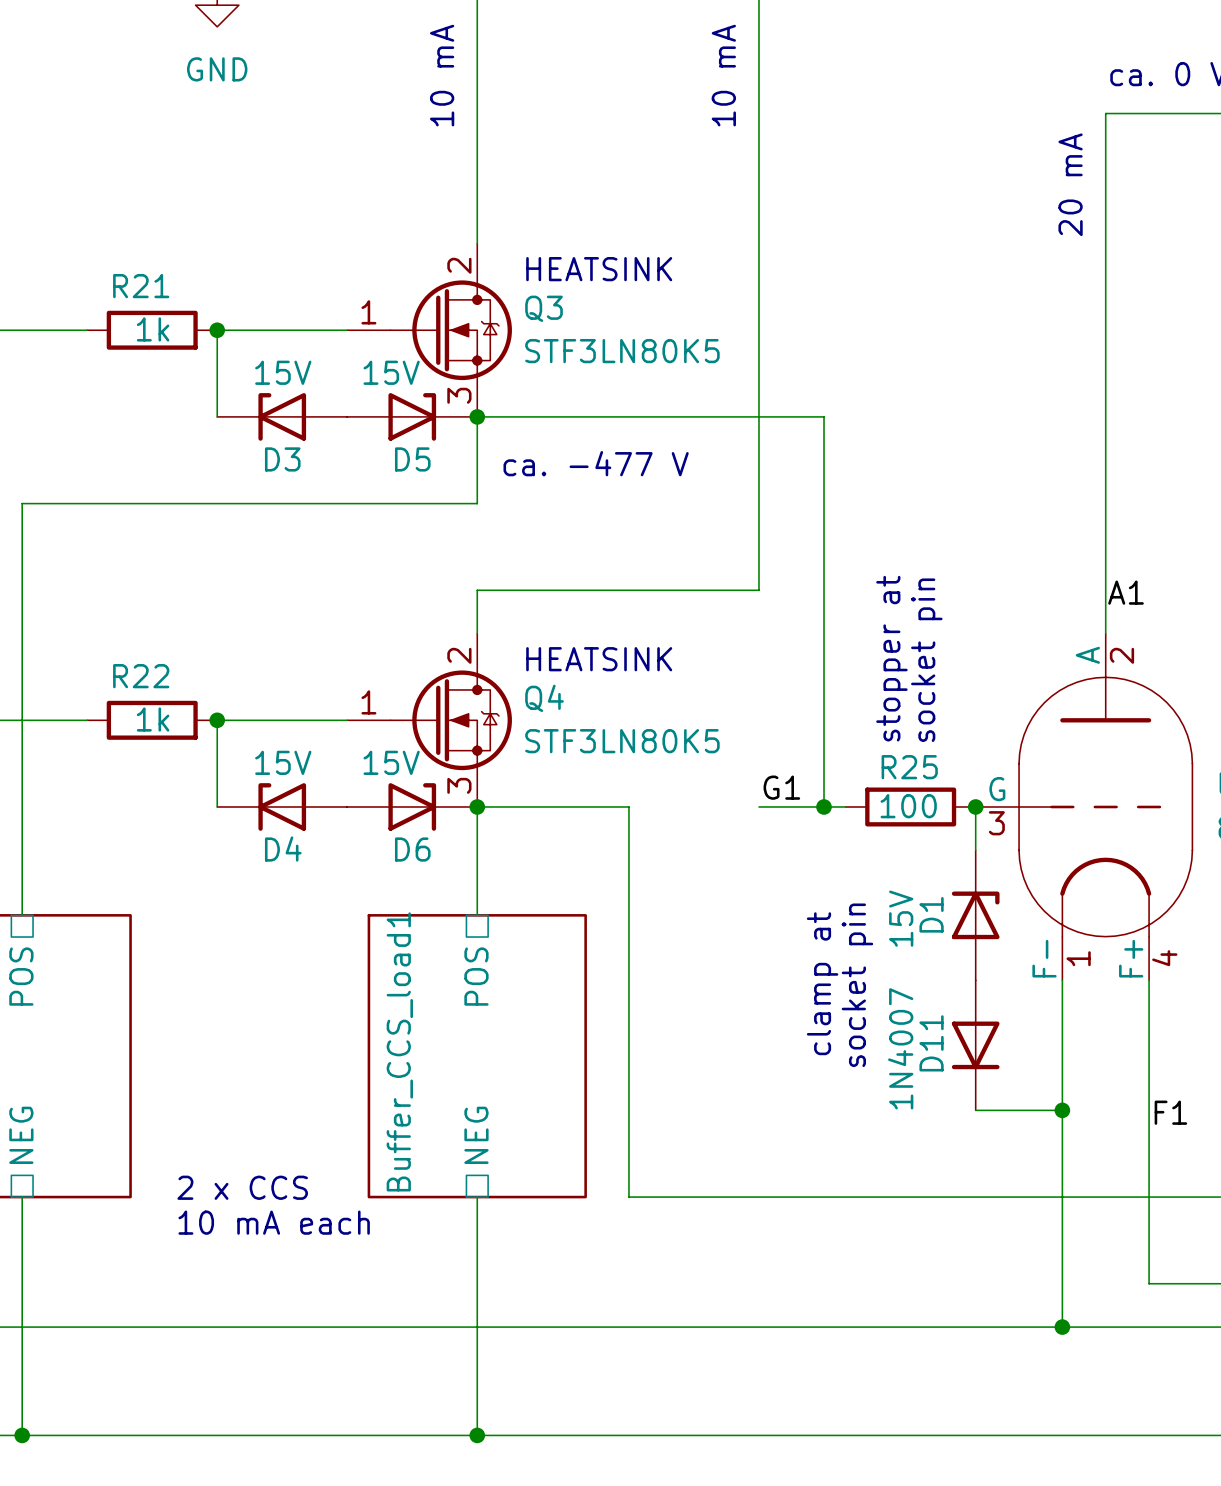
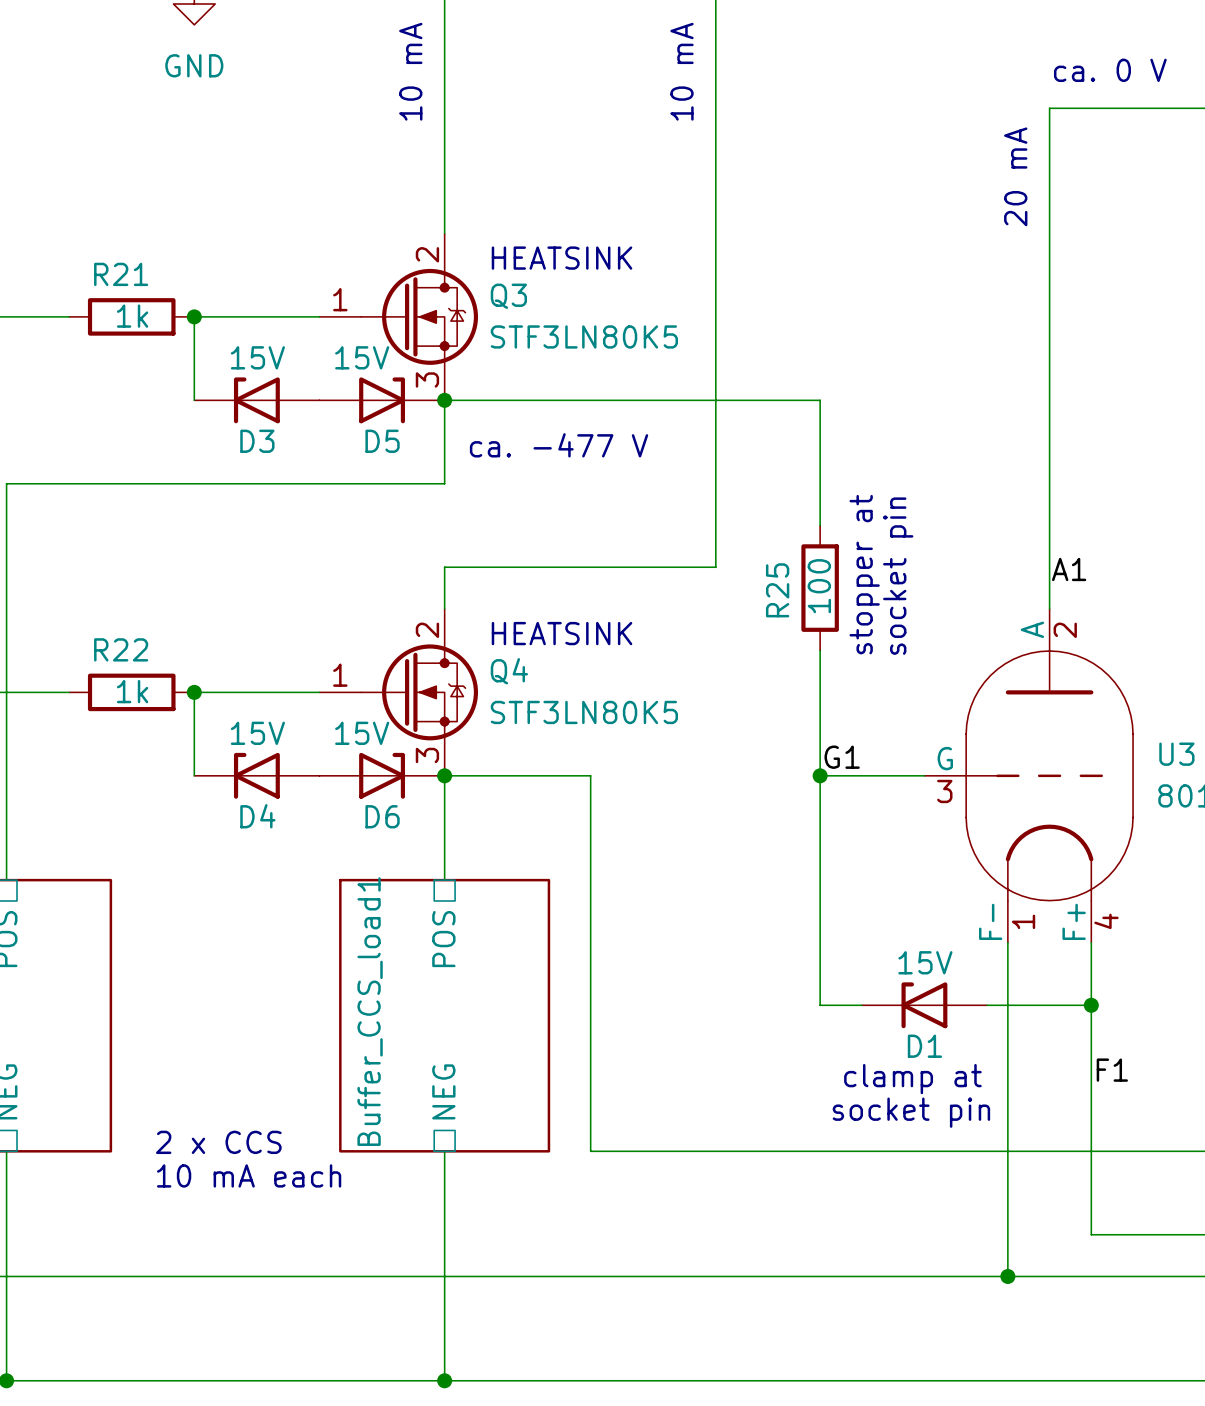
wire: (824, 416) (824, 806) -> (778, 400) (820, 400) (820, 525)
text position: stopper at (891, 658) -> stopper at (864, 574)
text position: socket pin (926, 660) -> socket pin (898, 576)
wire: none -> (820, 650) (820, 1005) (861, 1005)
R25 name position: R25 (909, 767) -> R25 (777, 590)
label position: G1 (781, 787) -> G1 (842, 757)
wire: (758, 806) (845, 806) -> none
junction position: (824, 806) -> (820, 775)
R25 rotation: 0° (910, 806) -> 90° clockwise (820, 588)
R25 position: (910, 806) -> (820, 588)
wire: (975, 806) (975, 850) -> (924, 775) (820, 775)
junction: (975, 806) -> none
D1 rotation: 0° (975, 915) -> 90° counterclockwise (924, 1005)
D1 position: (975, 915) -> (924, 1005)
D1 value position: 15V (901, 918) -> 15V (925, 962)
text rotation: 0° (822, 983) -> 90° clockwise (912, 1079)
text position: clamp at (822, 983) -> clamp at (912, 1079)
text: socket pin (857, 985) -> none
D11: 1N4007 (975, 1045) -> none
wire: none -> (987, 1005) (1091, 1005)
junction: none -> (1091, 1005)
wire: (975, 1110) (1062, 1110) -> none
junction: (1062, 1110) -> none
text: none -> socket pin (911, 1112)

